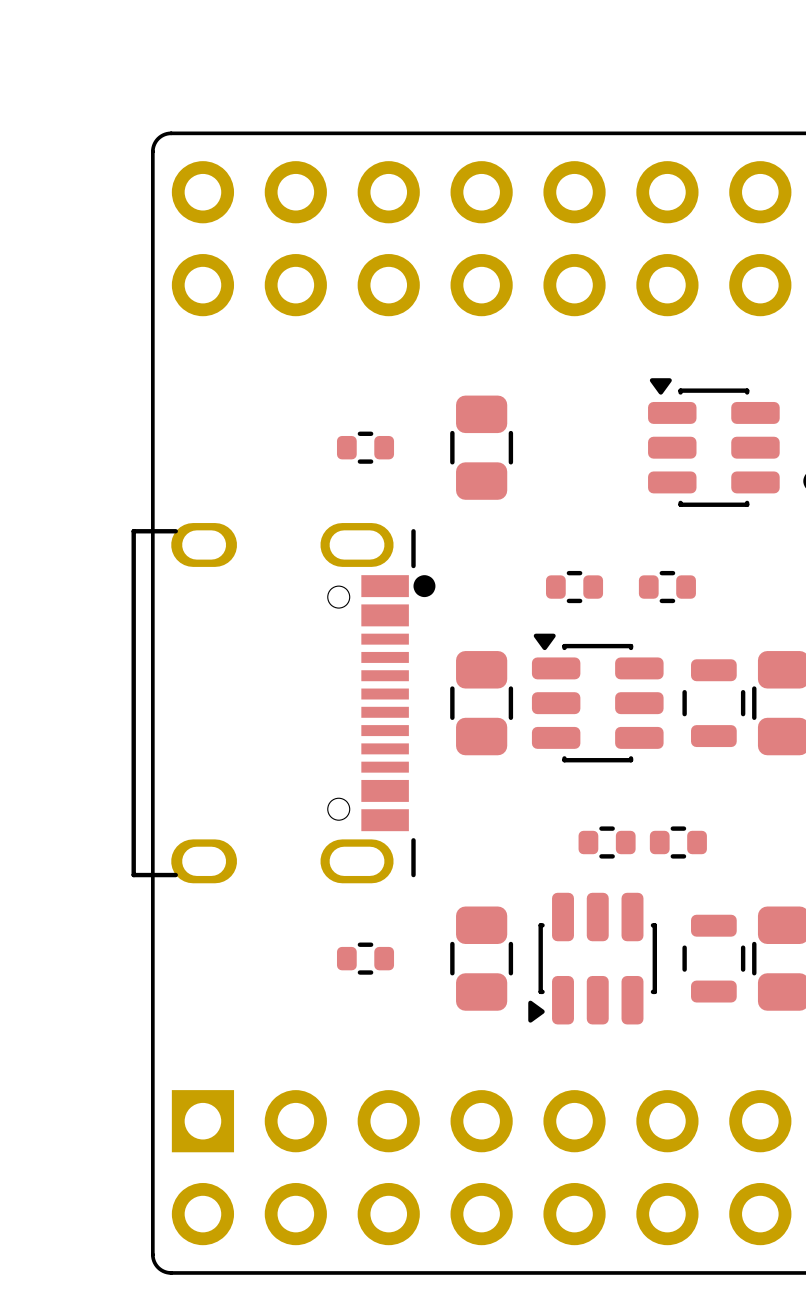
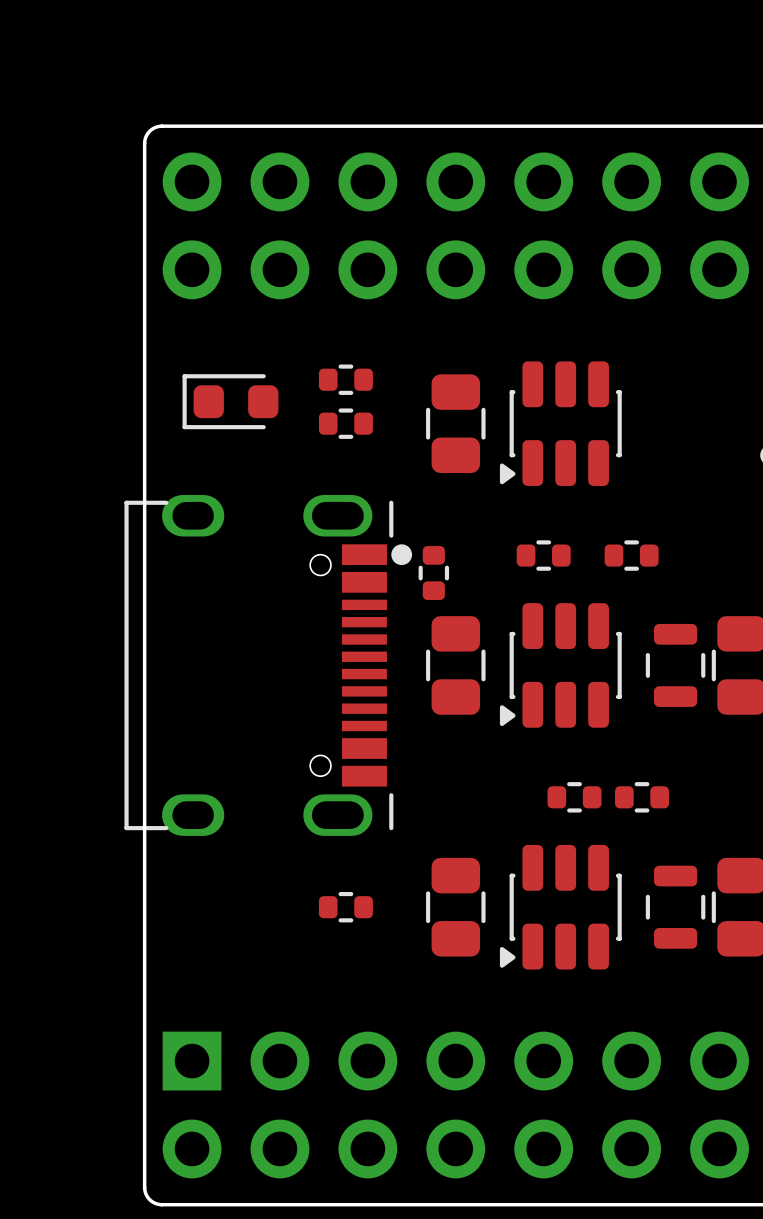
part: none -> (345, 379)
part: none -> (230, 401)
part rotation: 0° (713, 442) -> 90° counterclockwise (560, 423)
part position: (713, 442) -> (560, 423)
part: none -> (433, 573)
part rotation: 0° (597, 698) -> 90° counterclockwise (560, 665)

